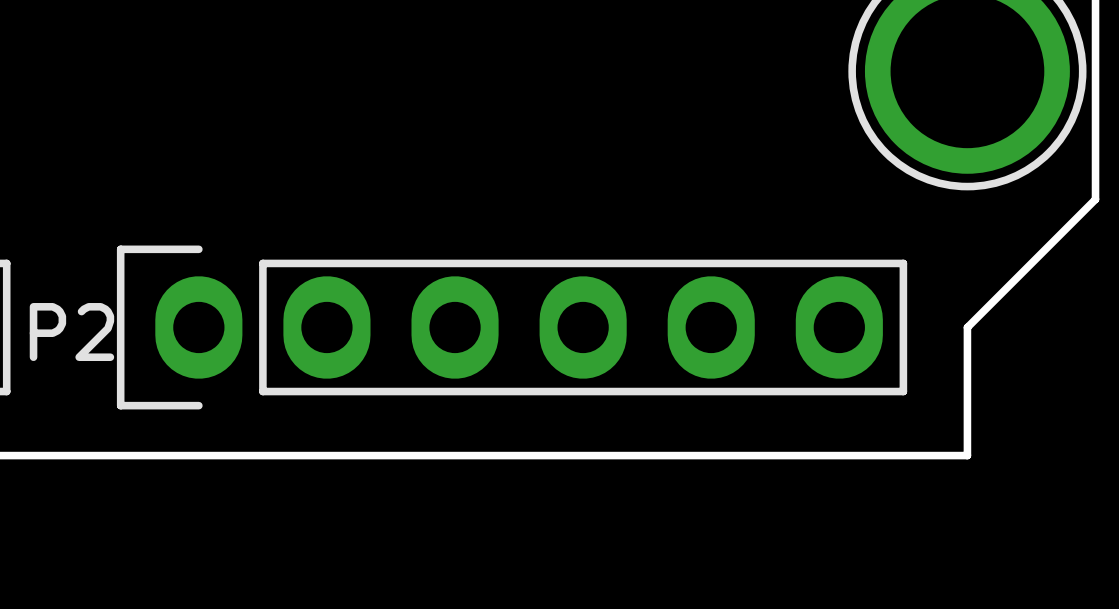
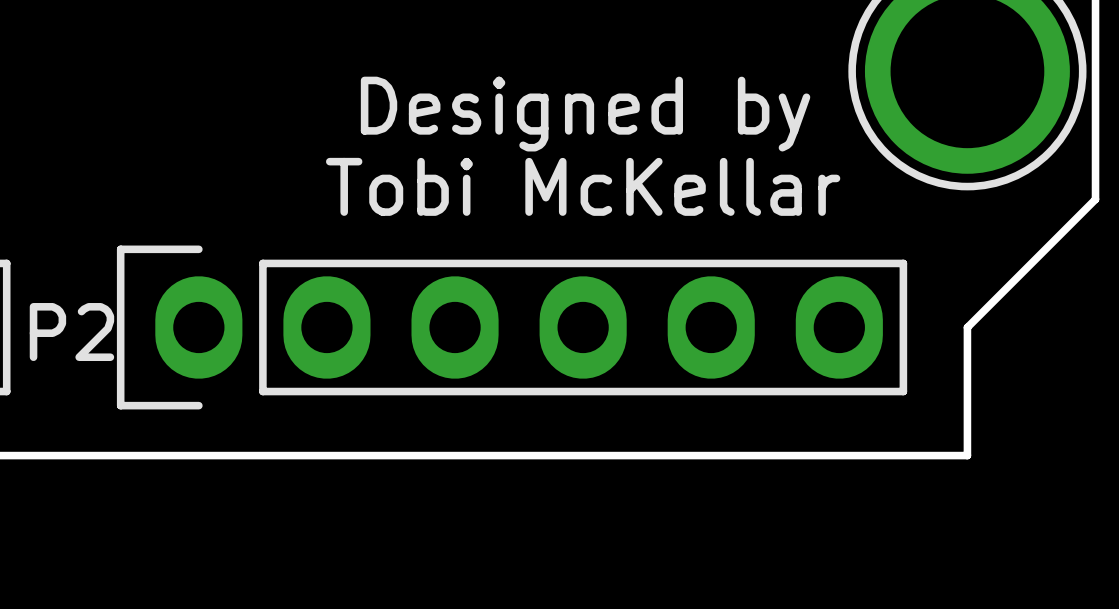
text: none -> Designed by (585, 114)
text: none -> Tobi McKellar (583, 186)

